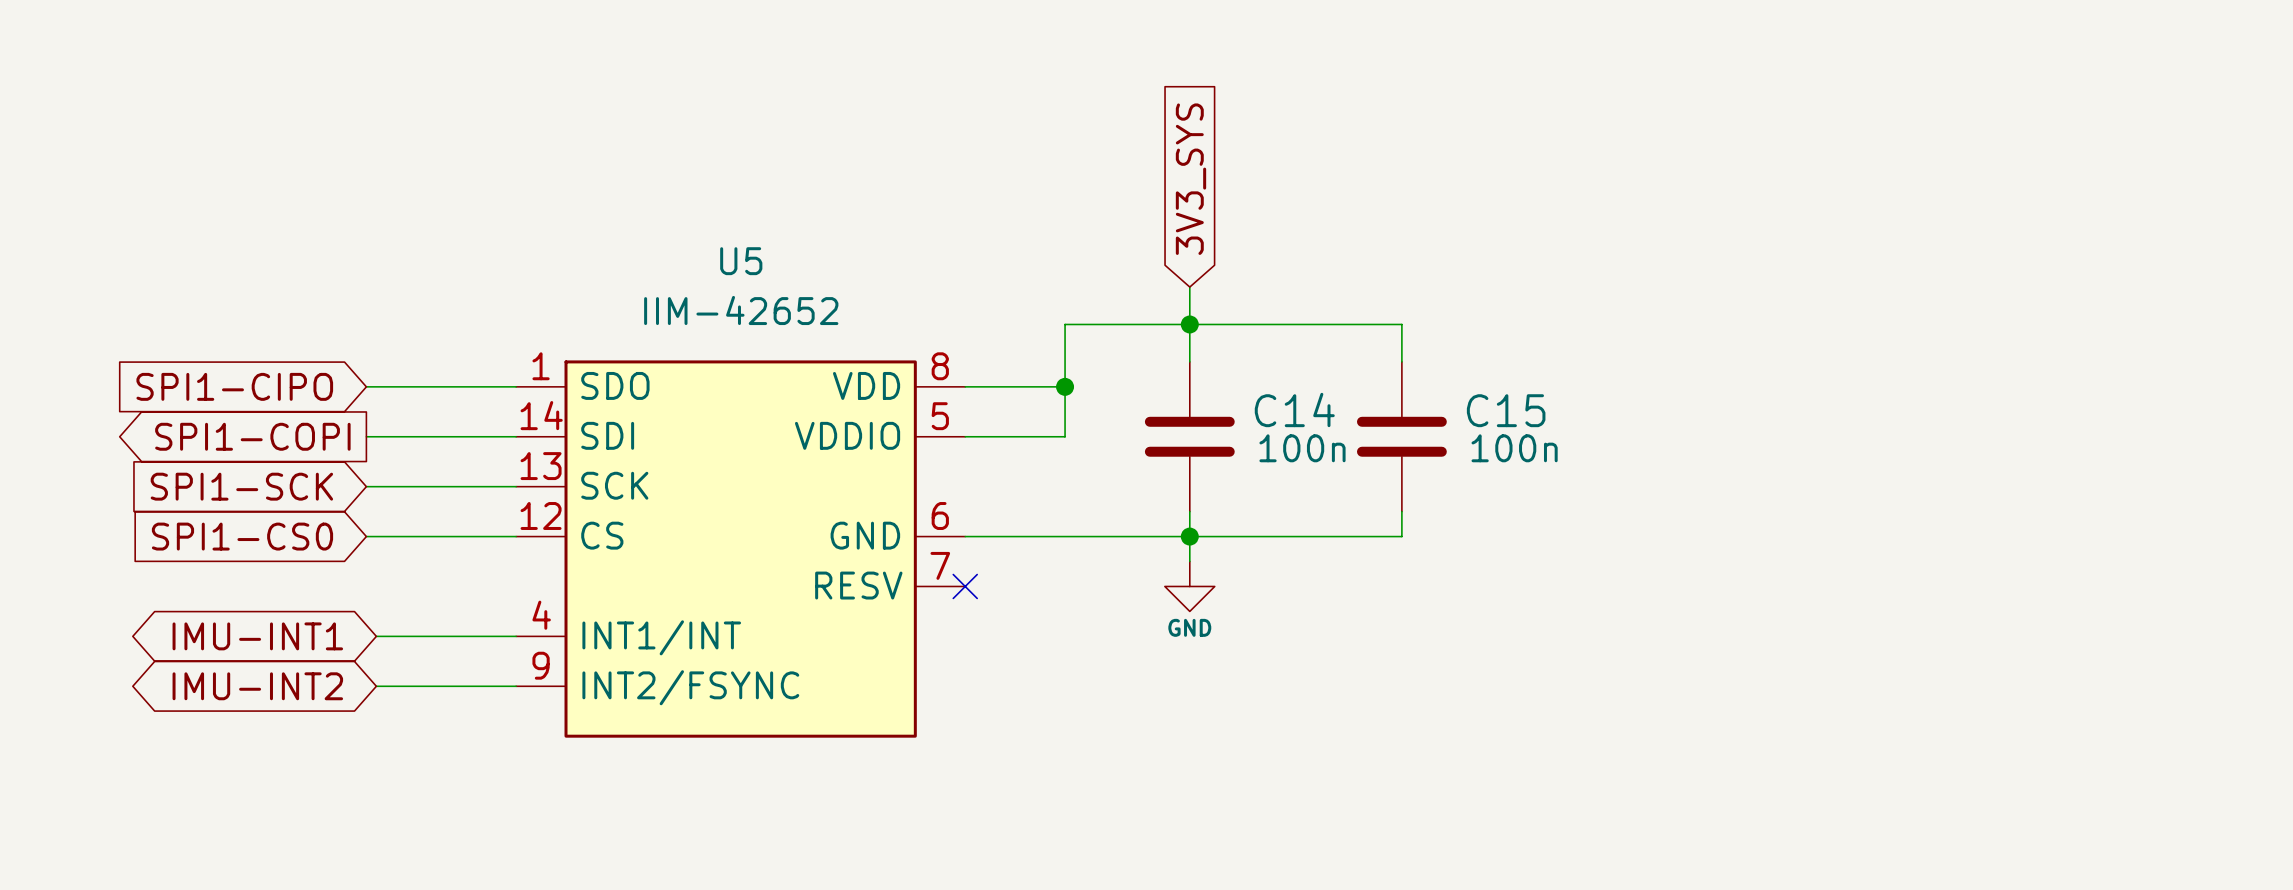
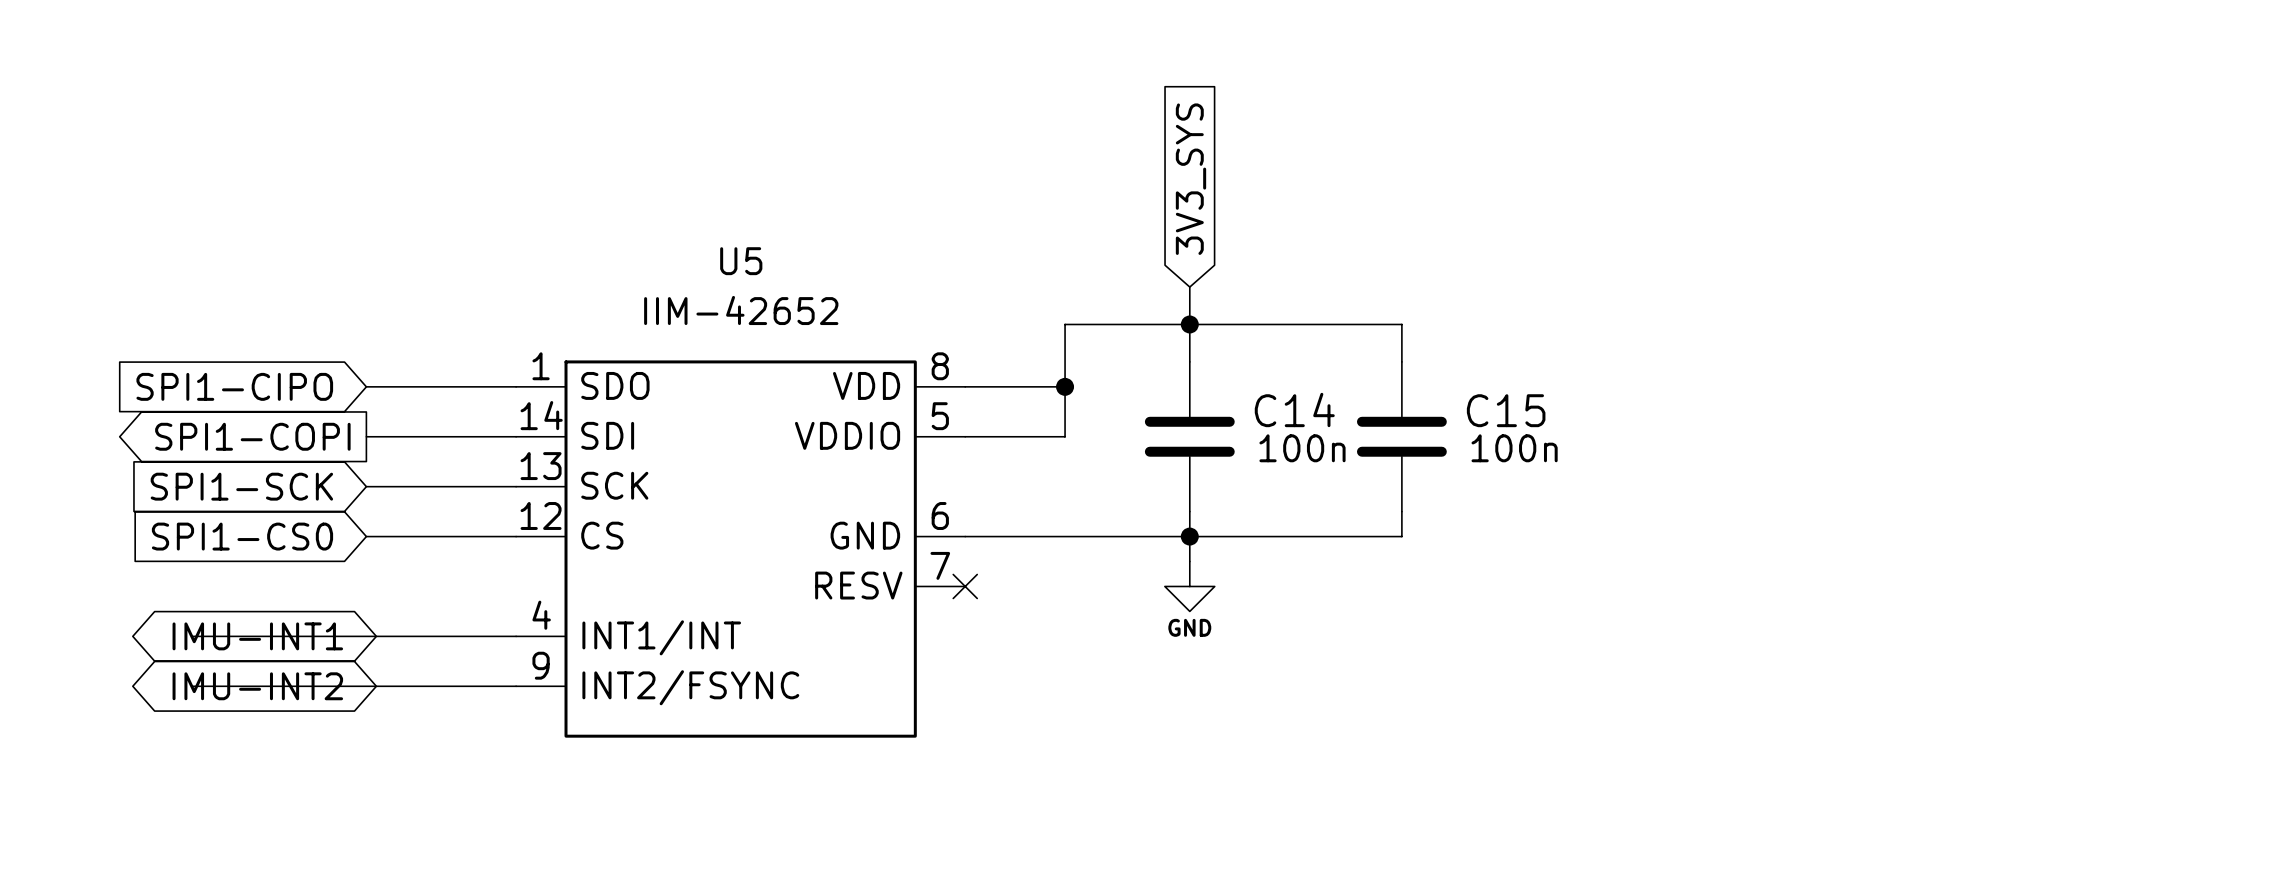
wire: none -> (191, 636) (376, 636)
wire: none -> (191, 686) (376, 686)

